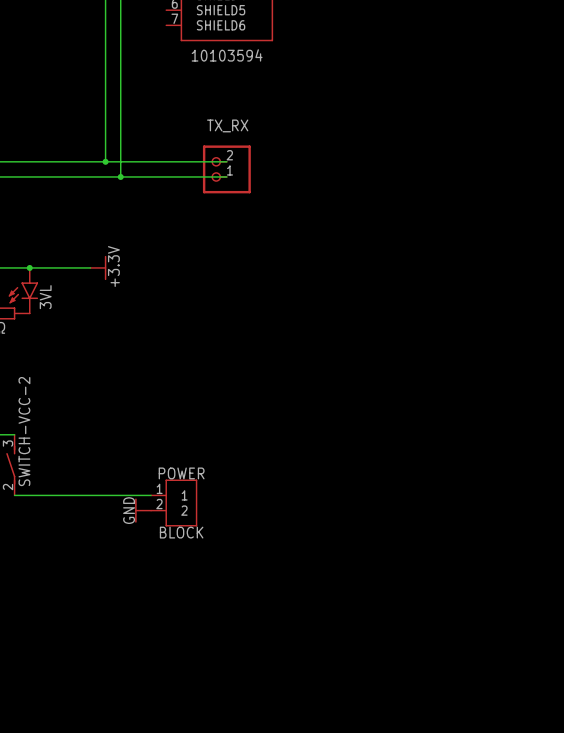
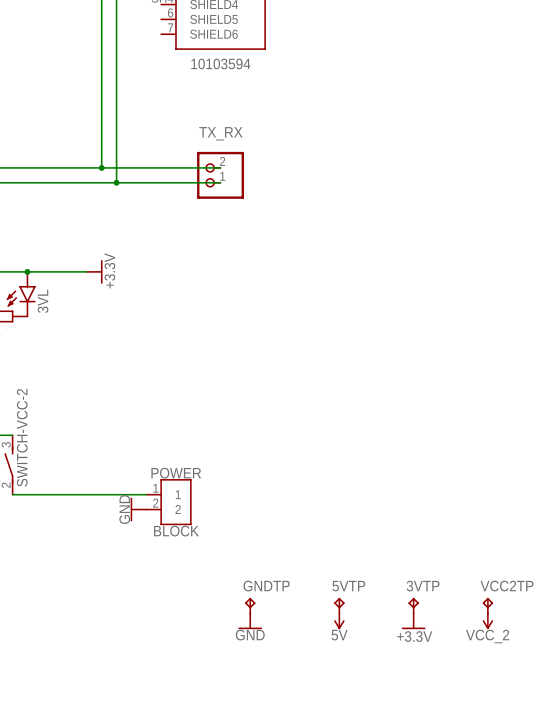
GNDTP: none -> (250, 605)
5VTP: none -> (339, 605)
3VTP: none -> (413, 605)
VCC2TP: none -> (487, 605)
power symbol: none -> GND (250, 621)
power symbol: none -> 5V (339, 621)
power symbol: none -> +3.3V (413, 621)
power symbol: none -> VCC_2 (487, 621)

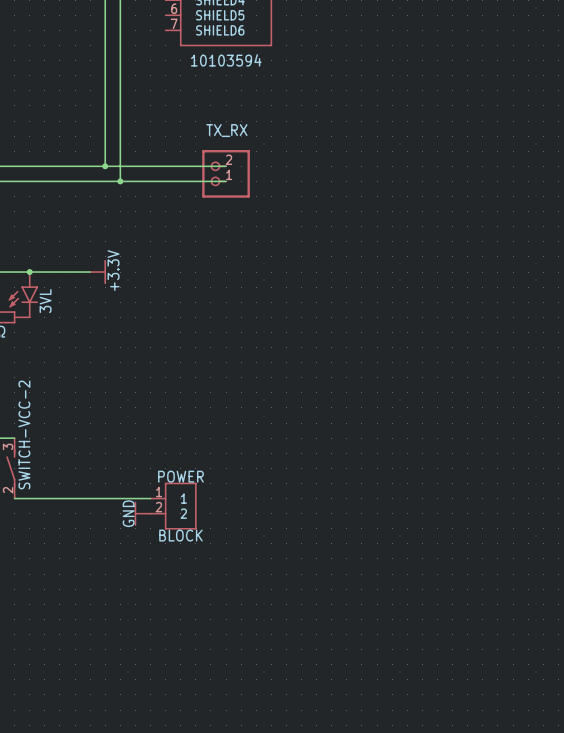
GNDTP: (250, 605) -> none
5VTP: (339, 605) -> none
3VTP: (413, 605) -> none
VCC2TP: (487, 605) -> none
power symbol: GND (250, 621) -> none
power symbol: 5V (339, 621) -> none
power symbol: +3.3V (413, 621) -> none
power symbol: VCC_2 (487, 621) -> none

